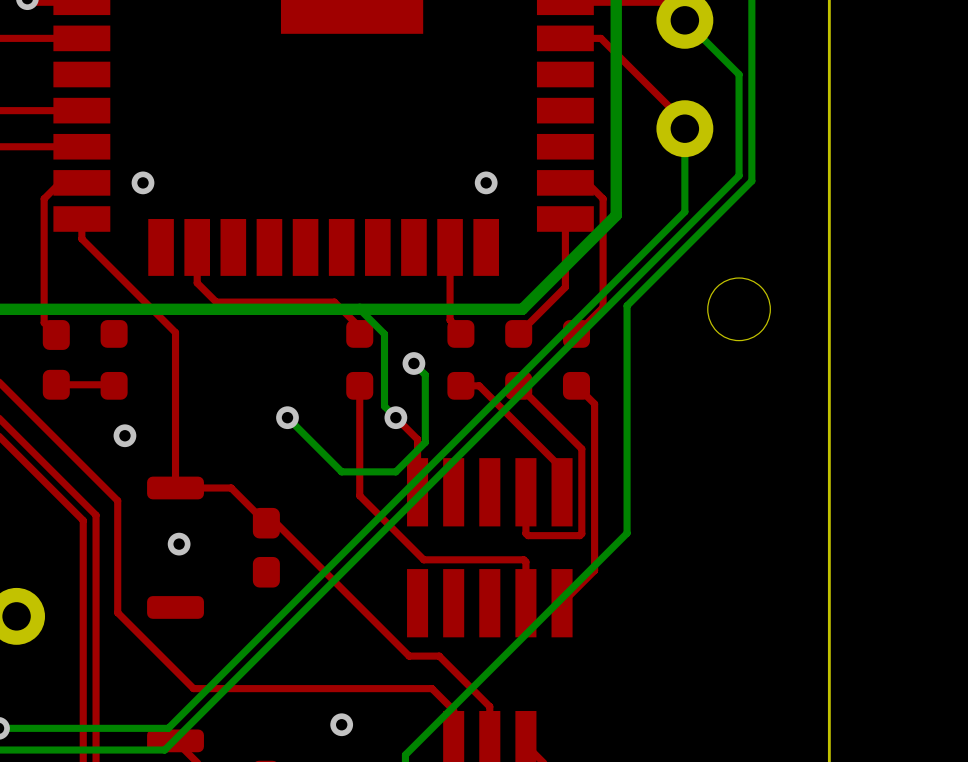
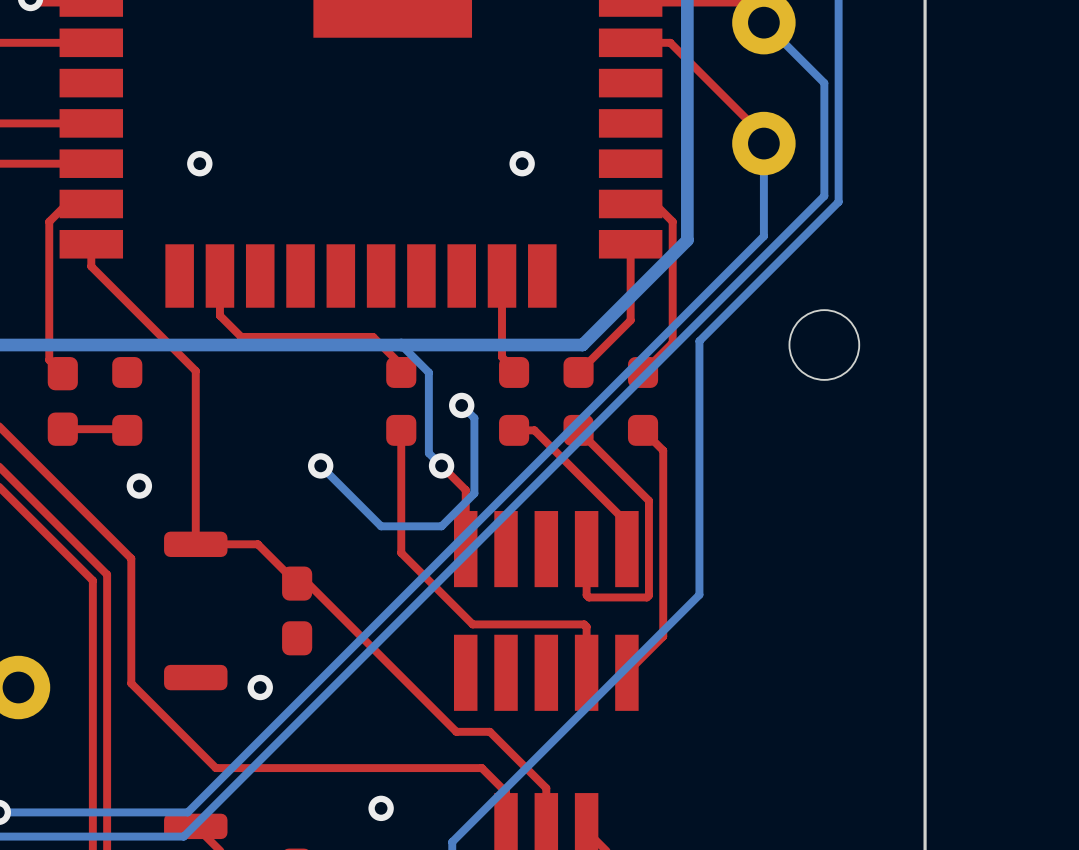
via position: (143, 182) -> (199, 163)
via position: (486, 182) -> (522, 163)
via position: (179, 544) -> (260, 687)

